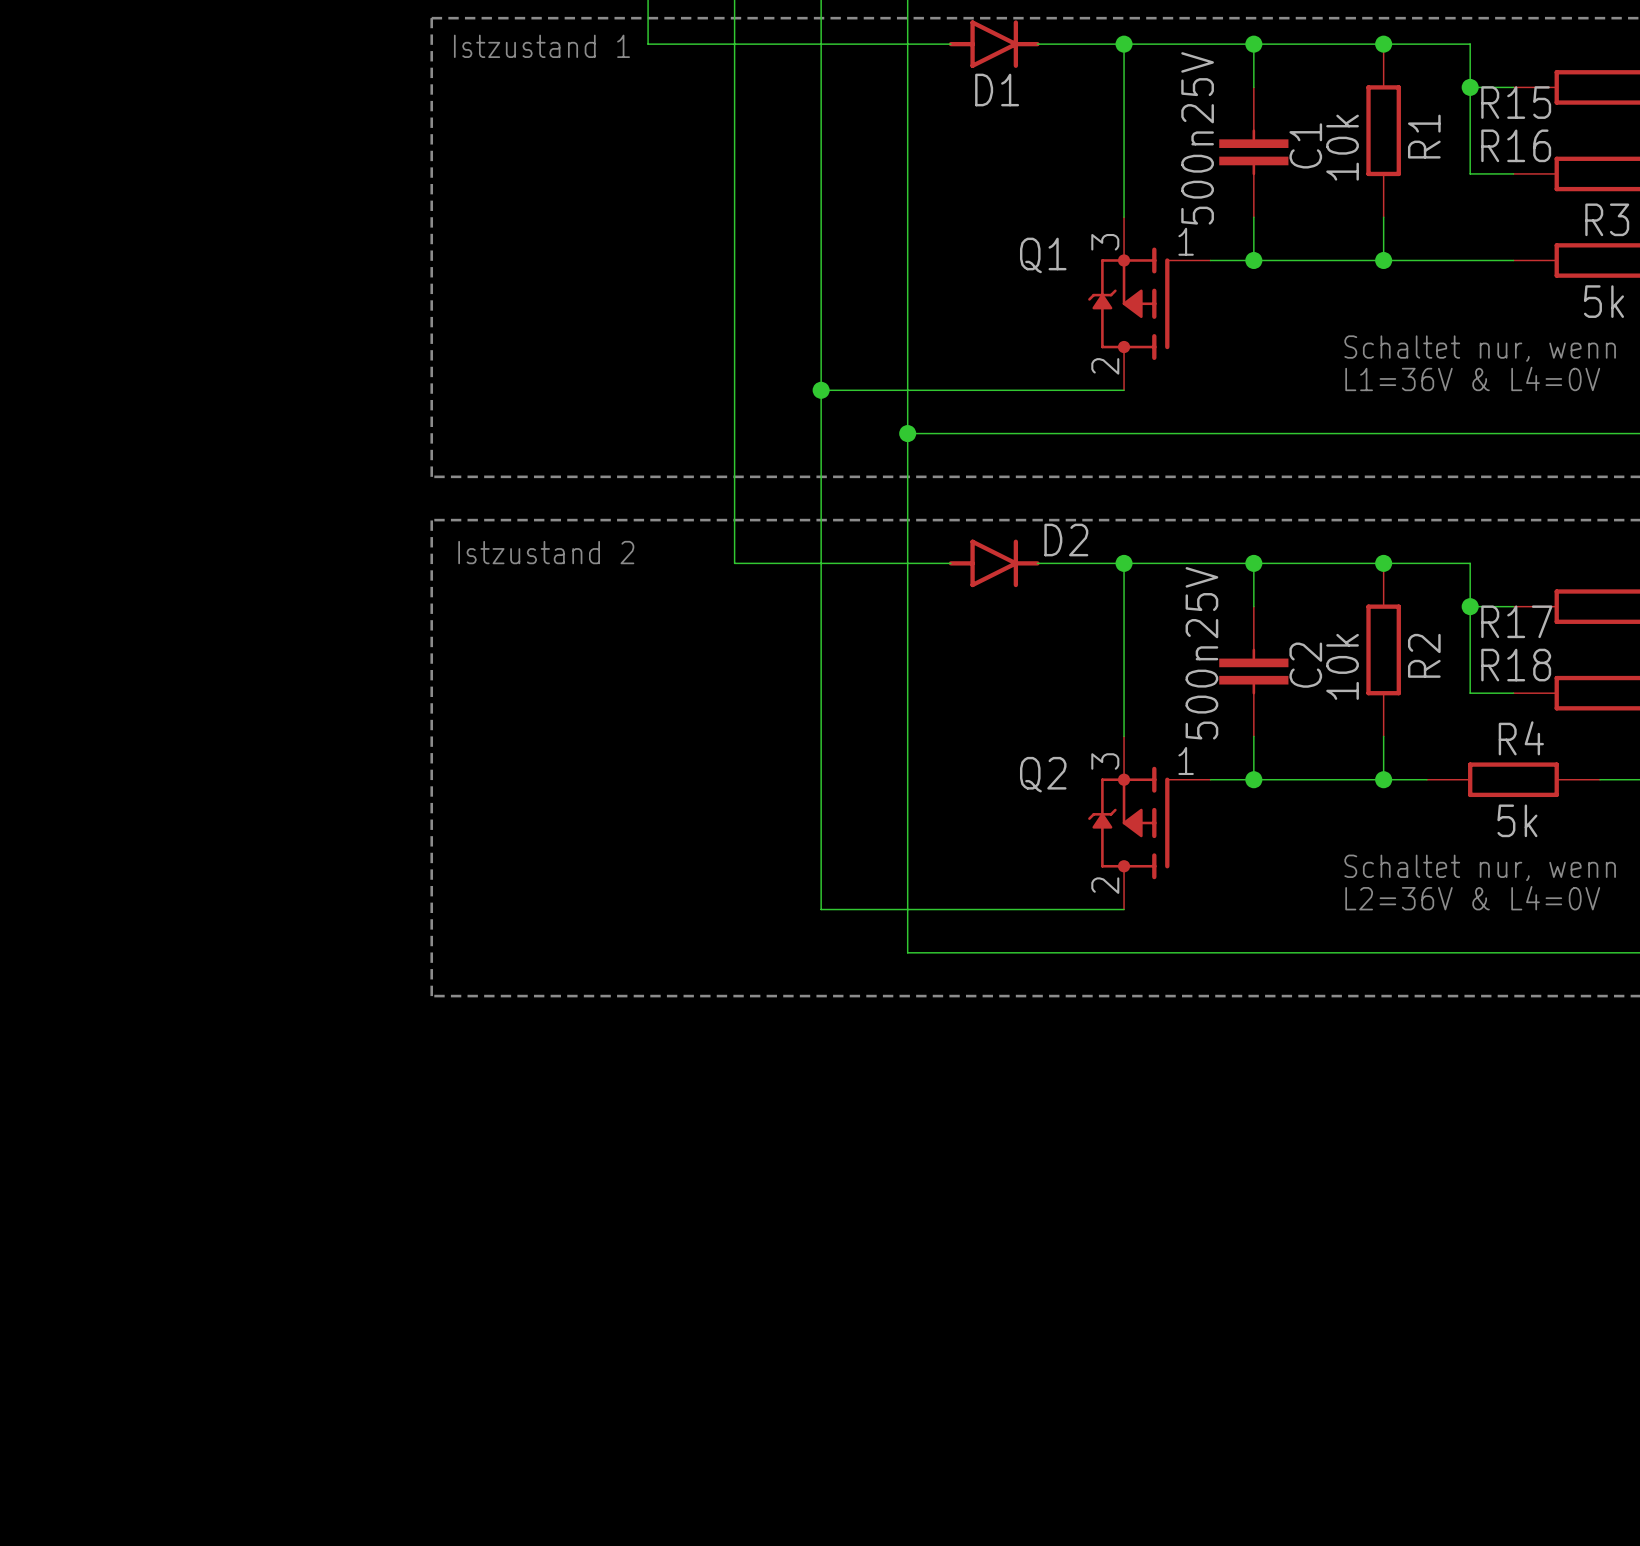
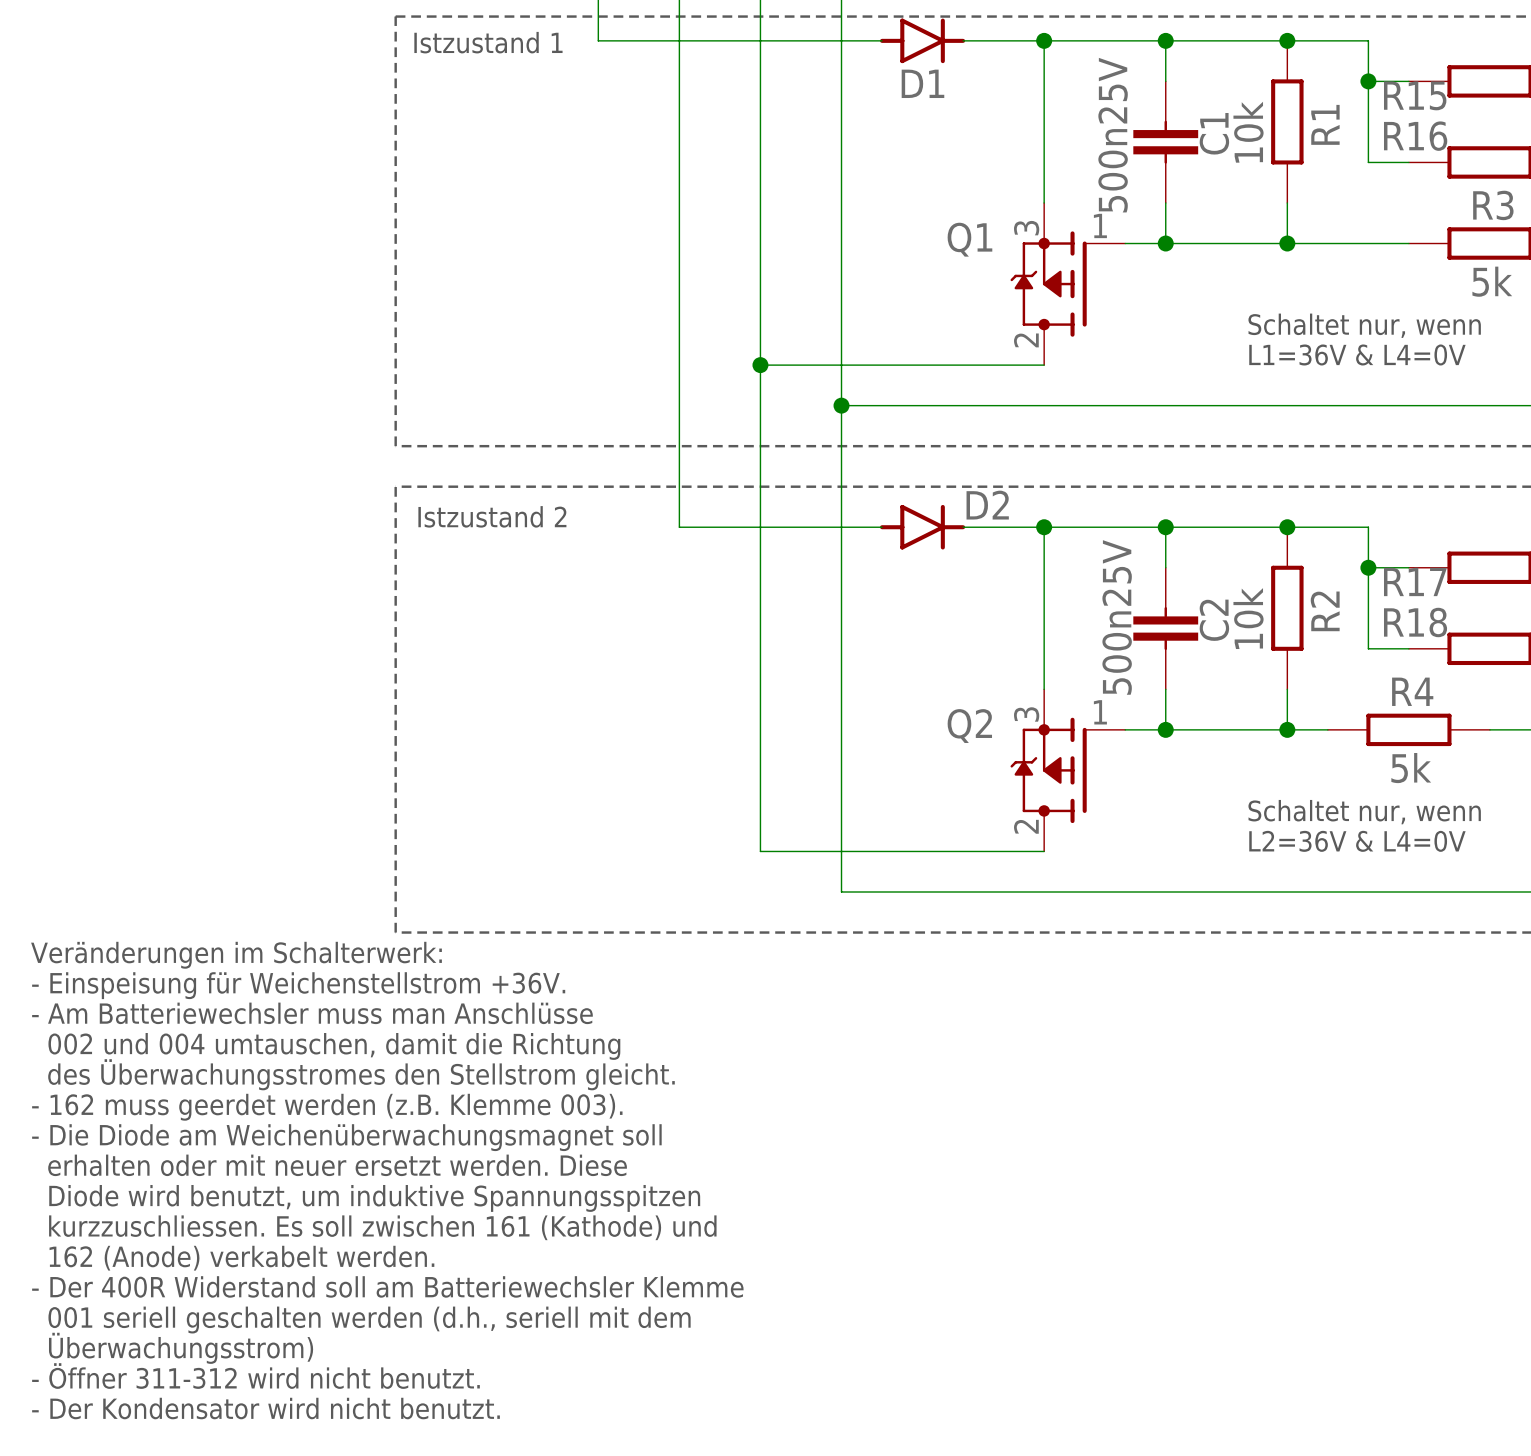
text: none -> Veränderungen im Schalterwerk: (236, 955)
text: none -> - Einspeisung für Weichenstellstrom +36V. (298, 985)
text: none -> - Am Batteriewechsler muss man Anschlüsse (312, 1013)
text: none -> 002 und 004 umtauschen, damit die Richtung (334, 1046)
text: none -> des Überwachungsstromes den Stellstrom gleicht. (361, 1074)
text: none -> - 162 muss geerdet werden (z.B. Klemme 003). (327, 1107)
text: none -> - Die Diode am Weichenüberwachungsmagnet soll (346, 1137)
text: none -> erhalten oder mit neuer ersetzt werden. Diese (337, 1165)
text: none -> Diode wird benutzt, um induktive Spannungsspitzen (374, 1198)
text: none -> kurzzuschliessen. Es soll zwischen 161 (Kathode) und (382, 1227)
text: none -> 162 (Anode) verkabelt werden. (241, 1258)
text: none -> - Der 400R Widerstand soll am Batteriewechsler Klemme (387, 1286)
text: none -> 001 seriell geschalten werden (d.h., seriell mit dem (369, 1320)
text: none -> Überwachungsstrom) (181, 1348)
text: none -> - Öffner 311-312 wird nicht benutzt. (255, 1376)
text: none -> - Der Kondensator wird nicht benutzt. (266, 1408)

